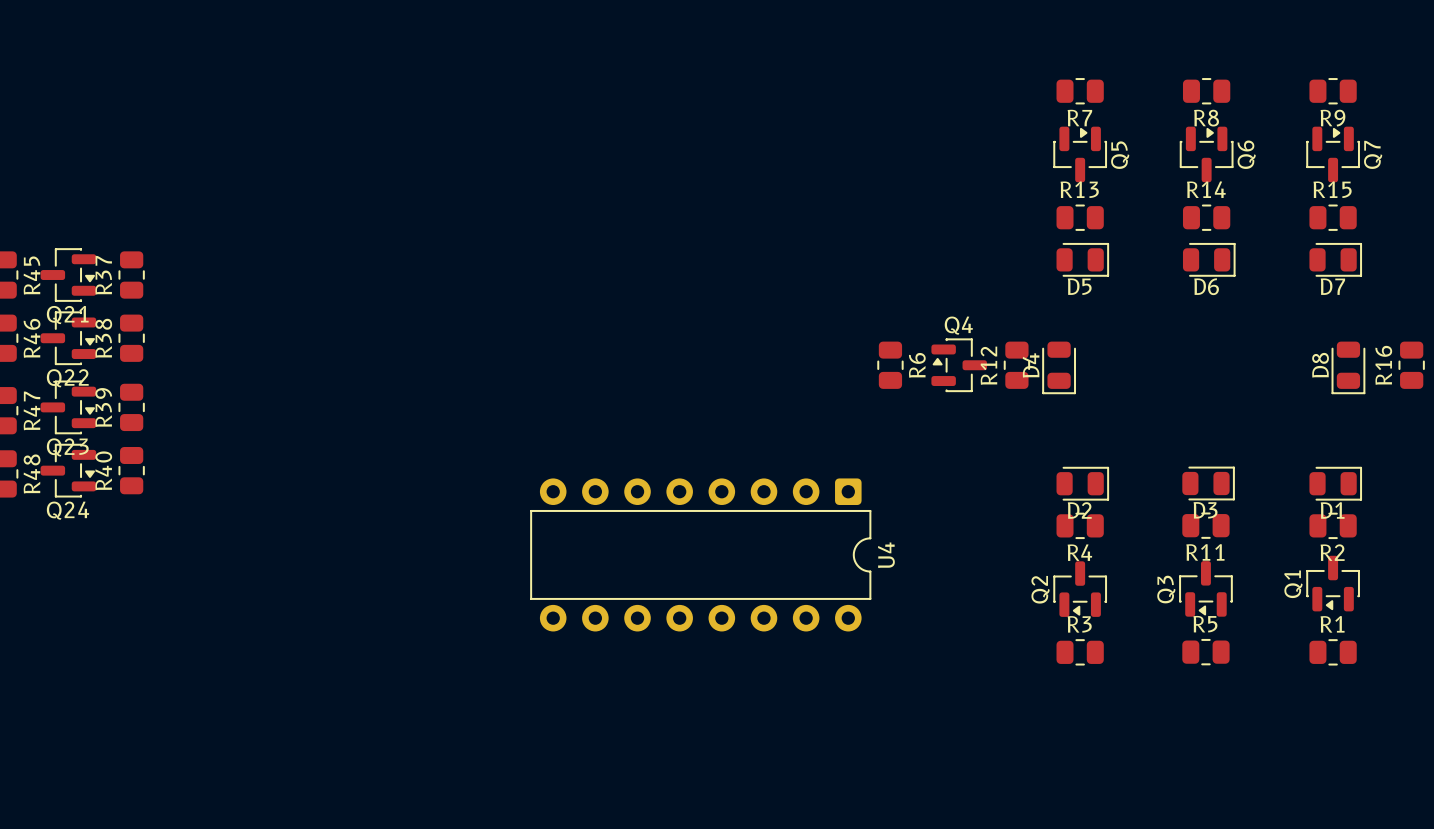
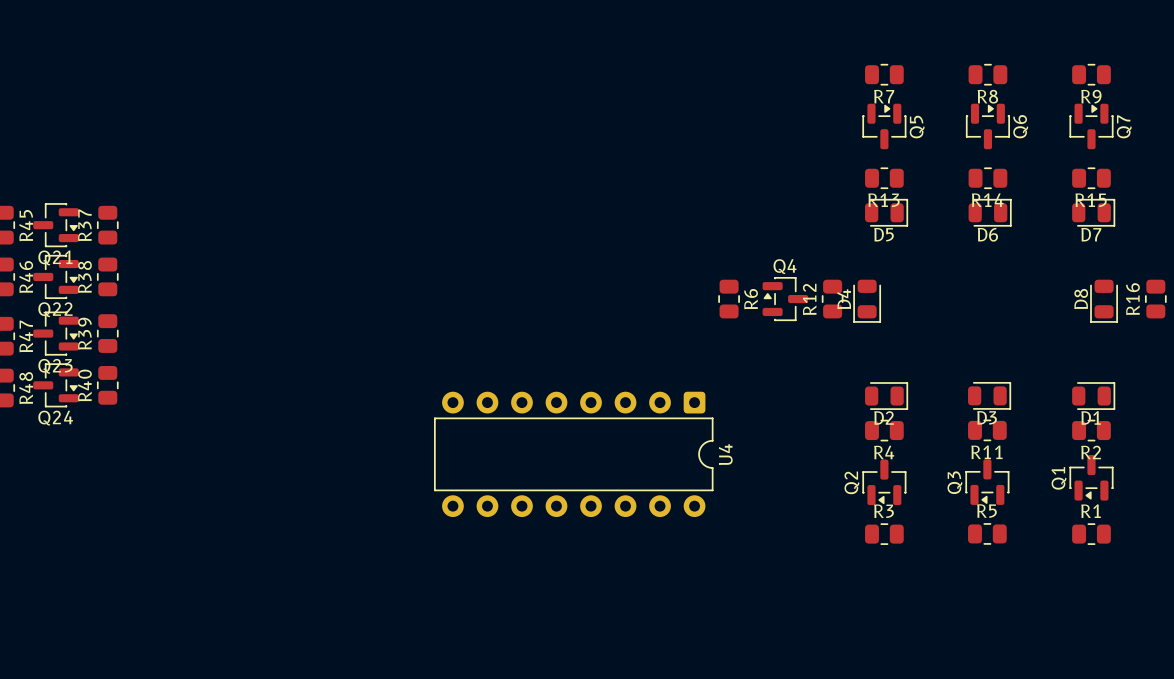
R13 name position: R13 (1079, 189) -> R13 (884, 200)
R14 name position: R14 (1206, 189) -> R14 (987, 200)
R15 name position: R15 (1332, 189) -> R15 (1091, 200)

